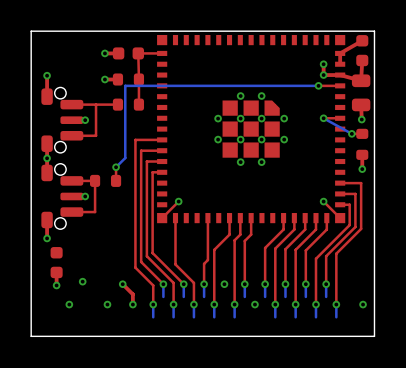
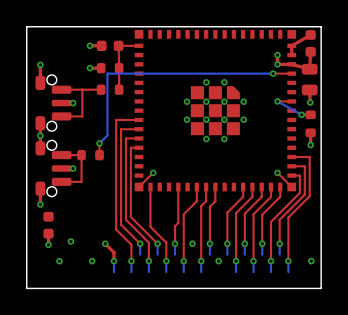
bottom track: none -> (113, 261) (113, 272)

